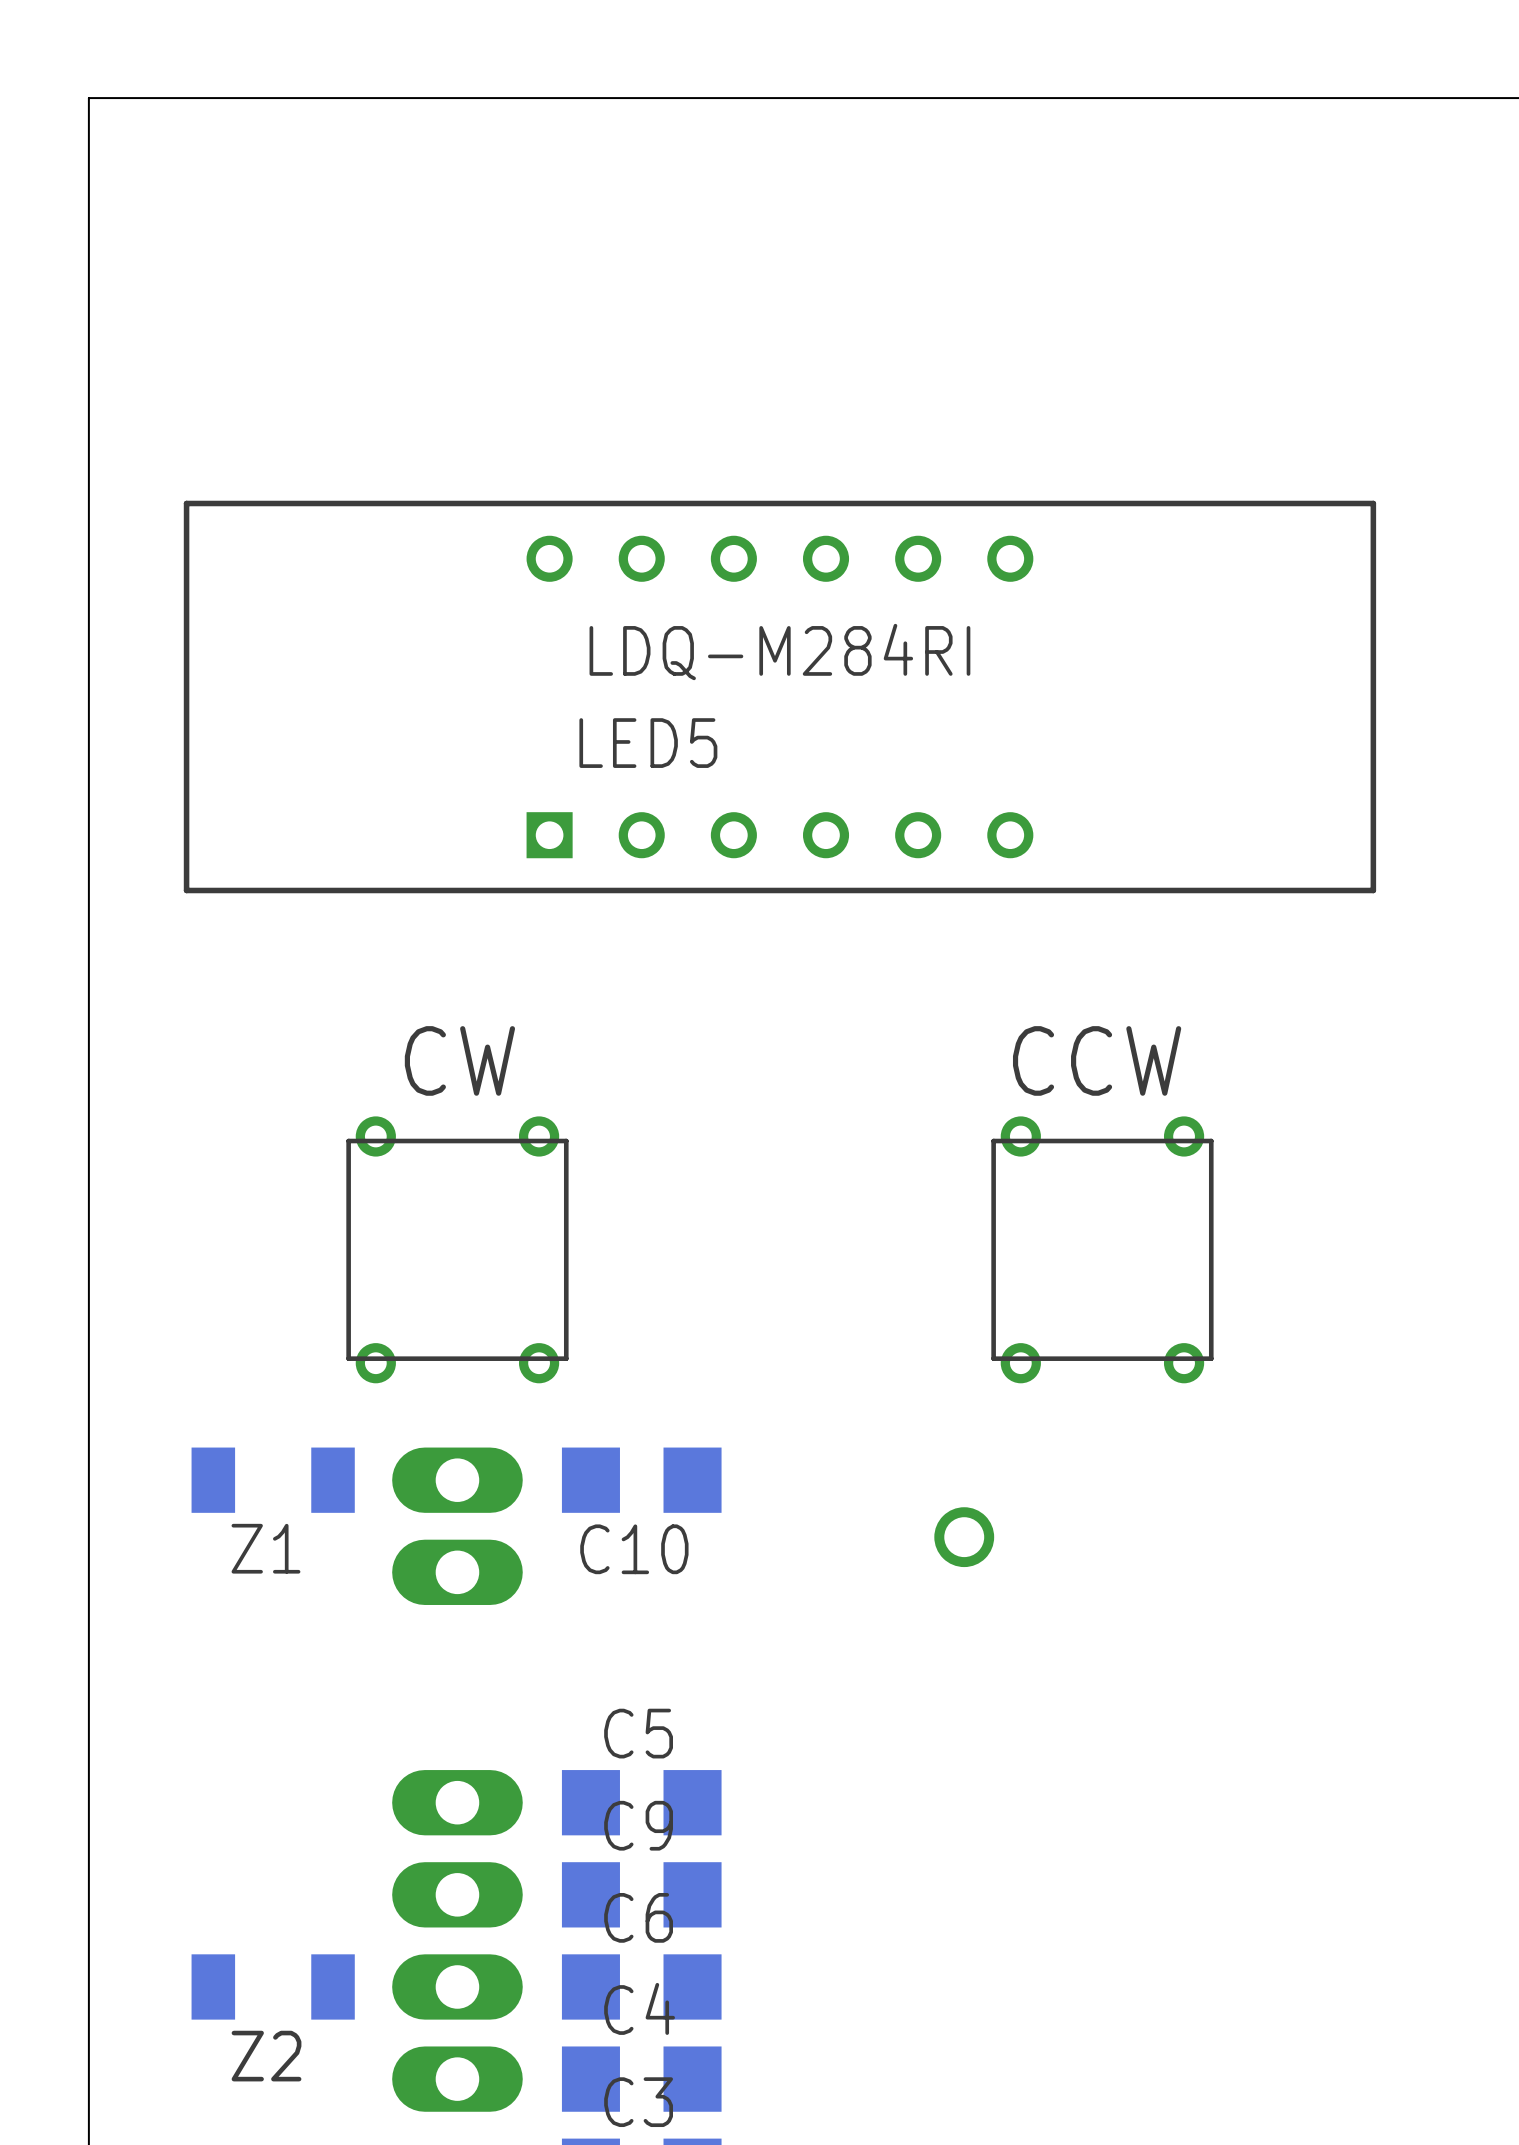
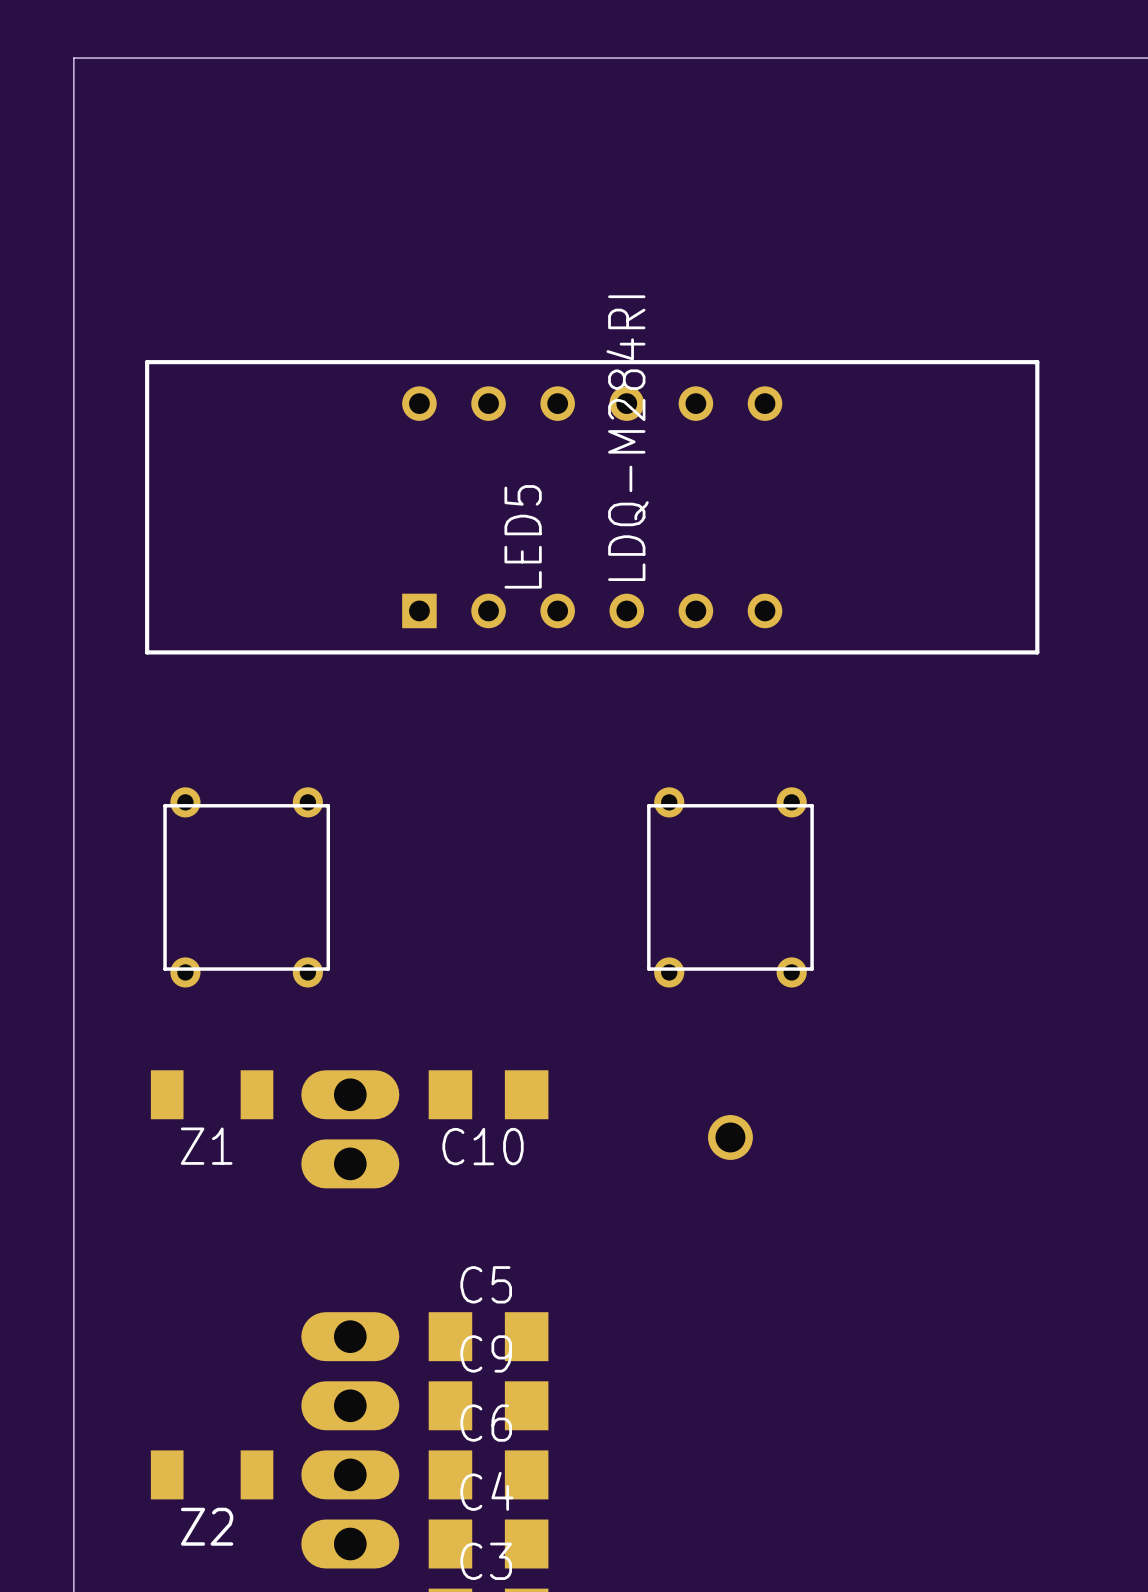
LED5 value rotation: 0° (779, 652) -> 90° counterclockwise (627, 438)
LED5 name rotation: 0° (648, 743) -> 90° counterclockwise (523, 536)
text: CW (459, 1060) -> none
text: CCW (1097, 1060) -> none
part position: (457, 1249) -> (246, 887)
part position: (1102, 1249) -> (730, 887)

